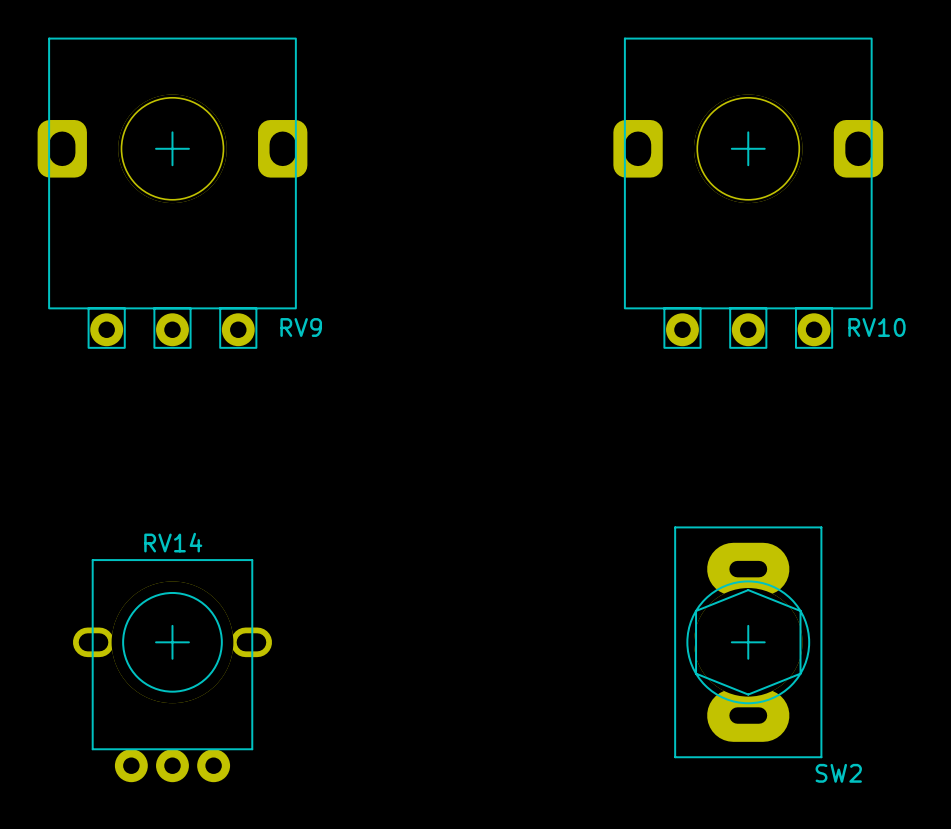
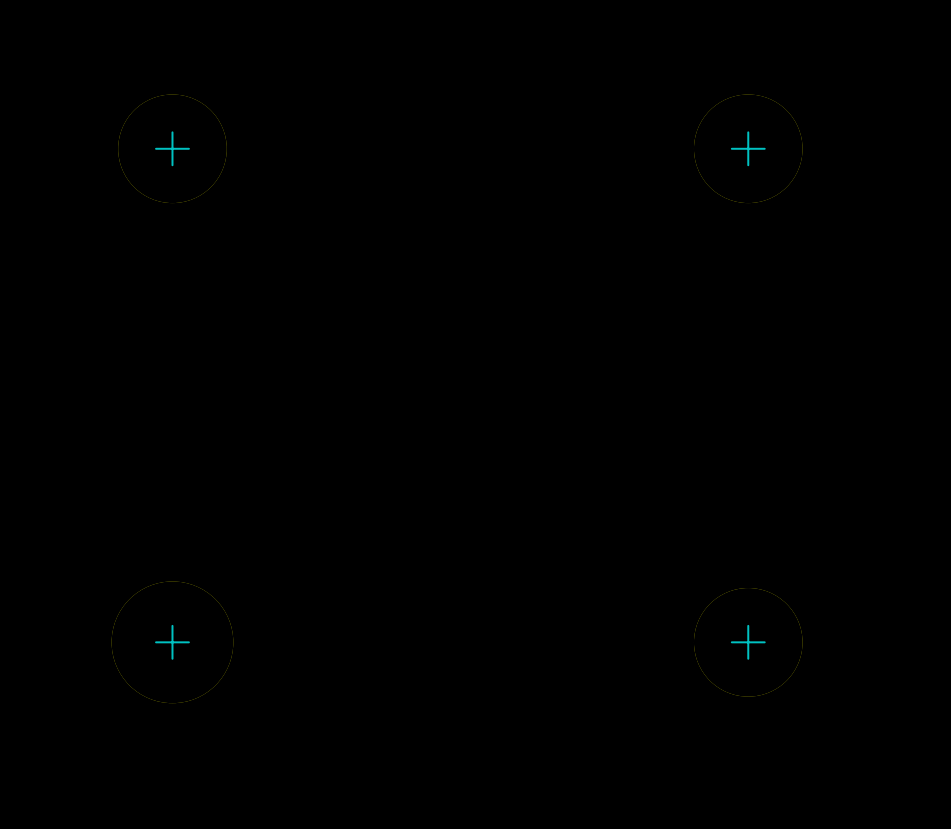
RV9: (172, 193) -> none
RV10: (748, 193) -> none
SW2: (748, 642) -> none
RV14: (172, 670) -> none

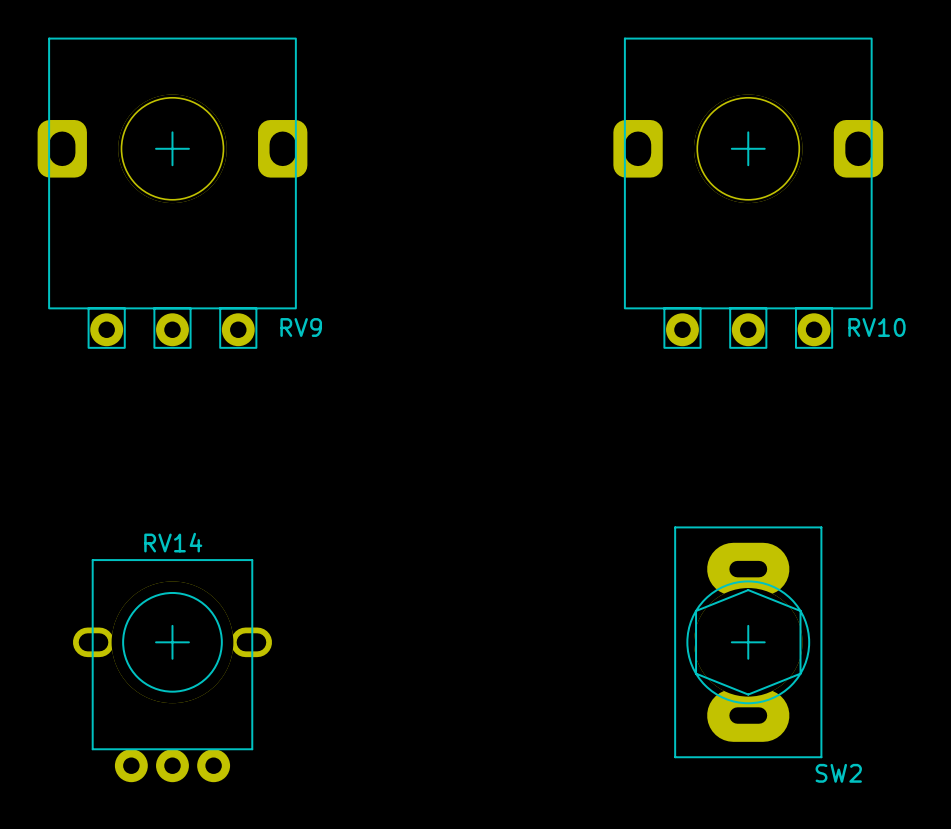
RV9: none -> (172, 193)
RV10: none -> (748, 193)
SW2: none -> (748, 642)
RV14: none -> (172, 670)

